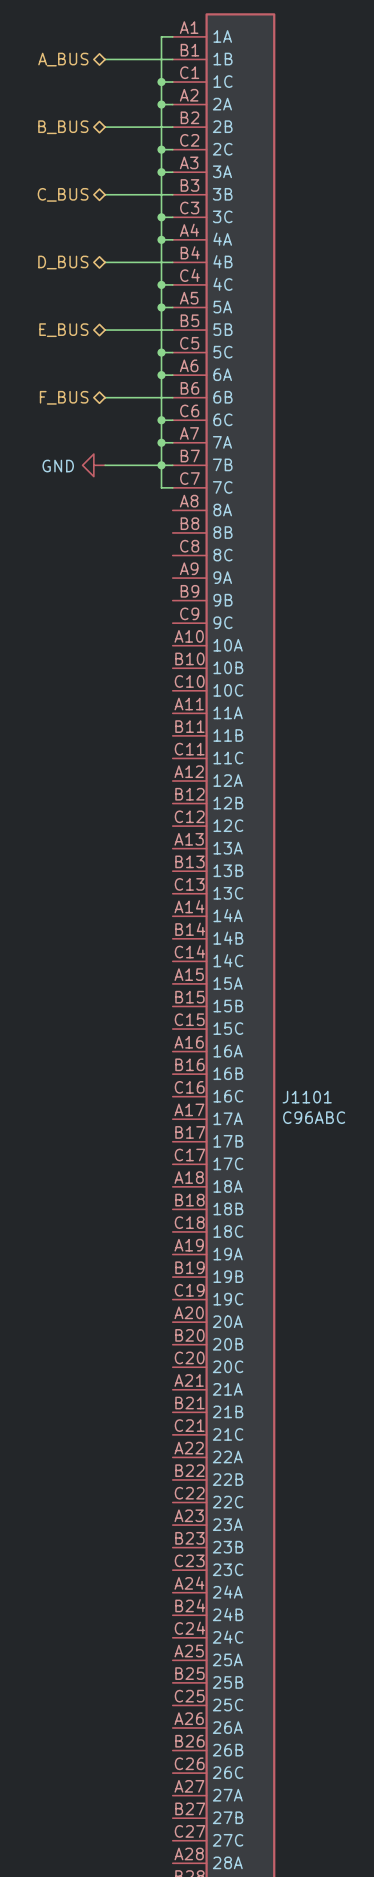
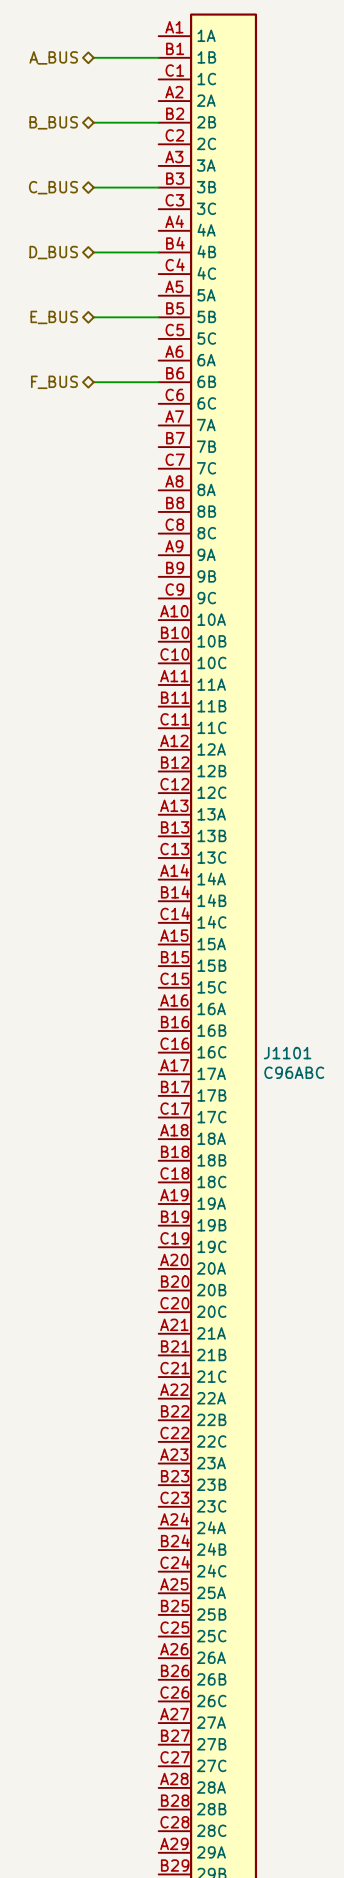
wire: (172, 36) (161, 36) (161, 487) (172, 487) -> none
wire: (161, 82) (172, 82) -> none
junction: (161, 82) -> none
wire: (161, 104) (172, 104) -> none
junction: (161, 104) -> none
wire: (161, 149) (172, 149) -> none
junction: (161, 149) -> none
wire: (161, 172) (172, 172) -> none
junction: (161, 172) -> none
wire: (161, 217) (172, 217) -> none
junction: (161, 217) -> none
wire: (161, 239) (172, 239) -> none
junction: (161, 239) -> none
wire: (161, 284) (172, 284) -> none
junction: (161, 284) -> none
wire: (161, 307) (172, 307) -> none
junction: (161, 307) -> none
wire: (161, 352) (172, 352) -> none
junction: (161, 352) -> none
wire: (161, 375) (172, 375) -> none
junction: (161, 375) -> none
wire: (161, 420) (172, 420) -> none
junction: (161, 420) -> none
wire: (161, 442) (172, 442) -> none
junction: (161, 442) -> none
power symbol: GND (93, 465) -> none
wire: (105, 465) (172, 465) -> none
junction: (161, 465) -> none

